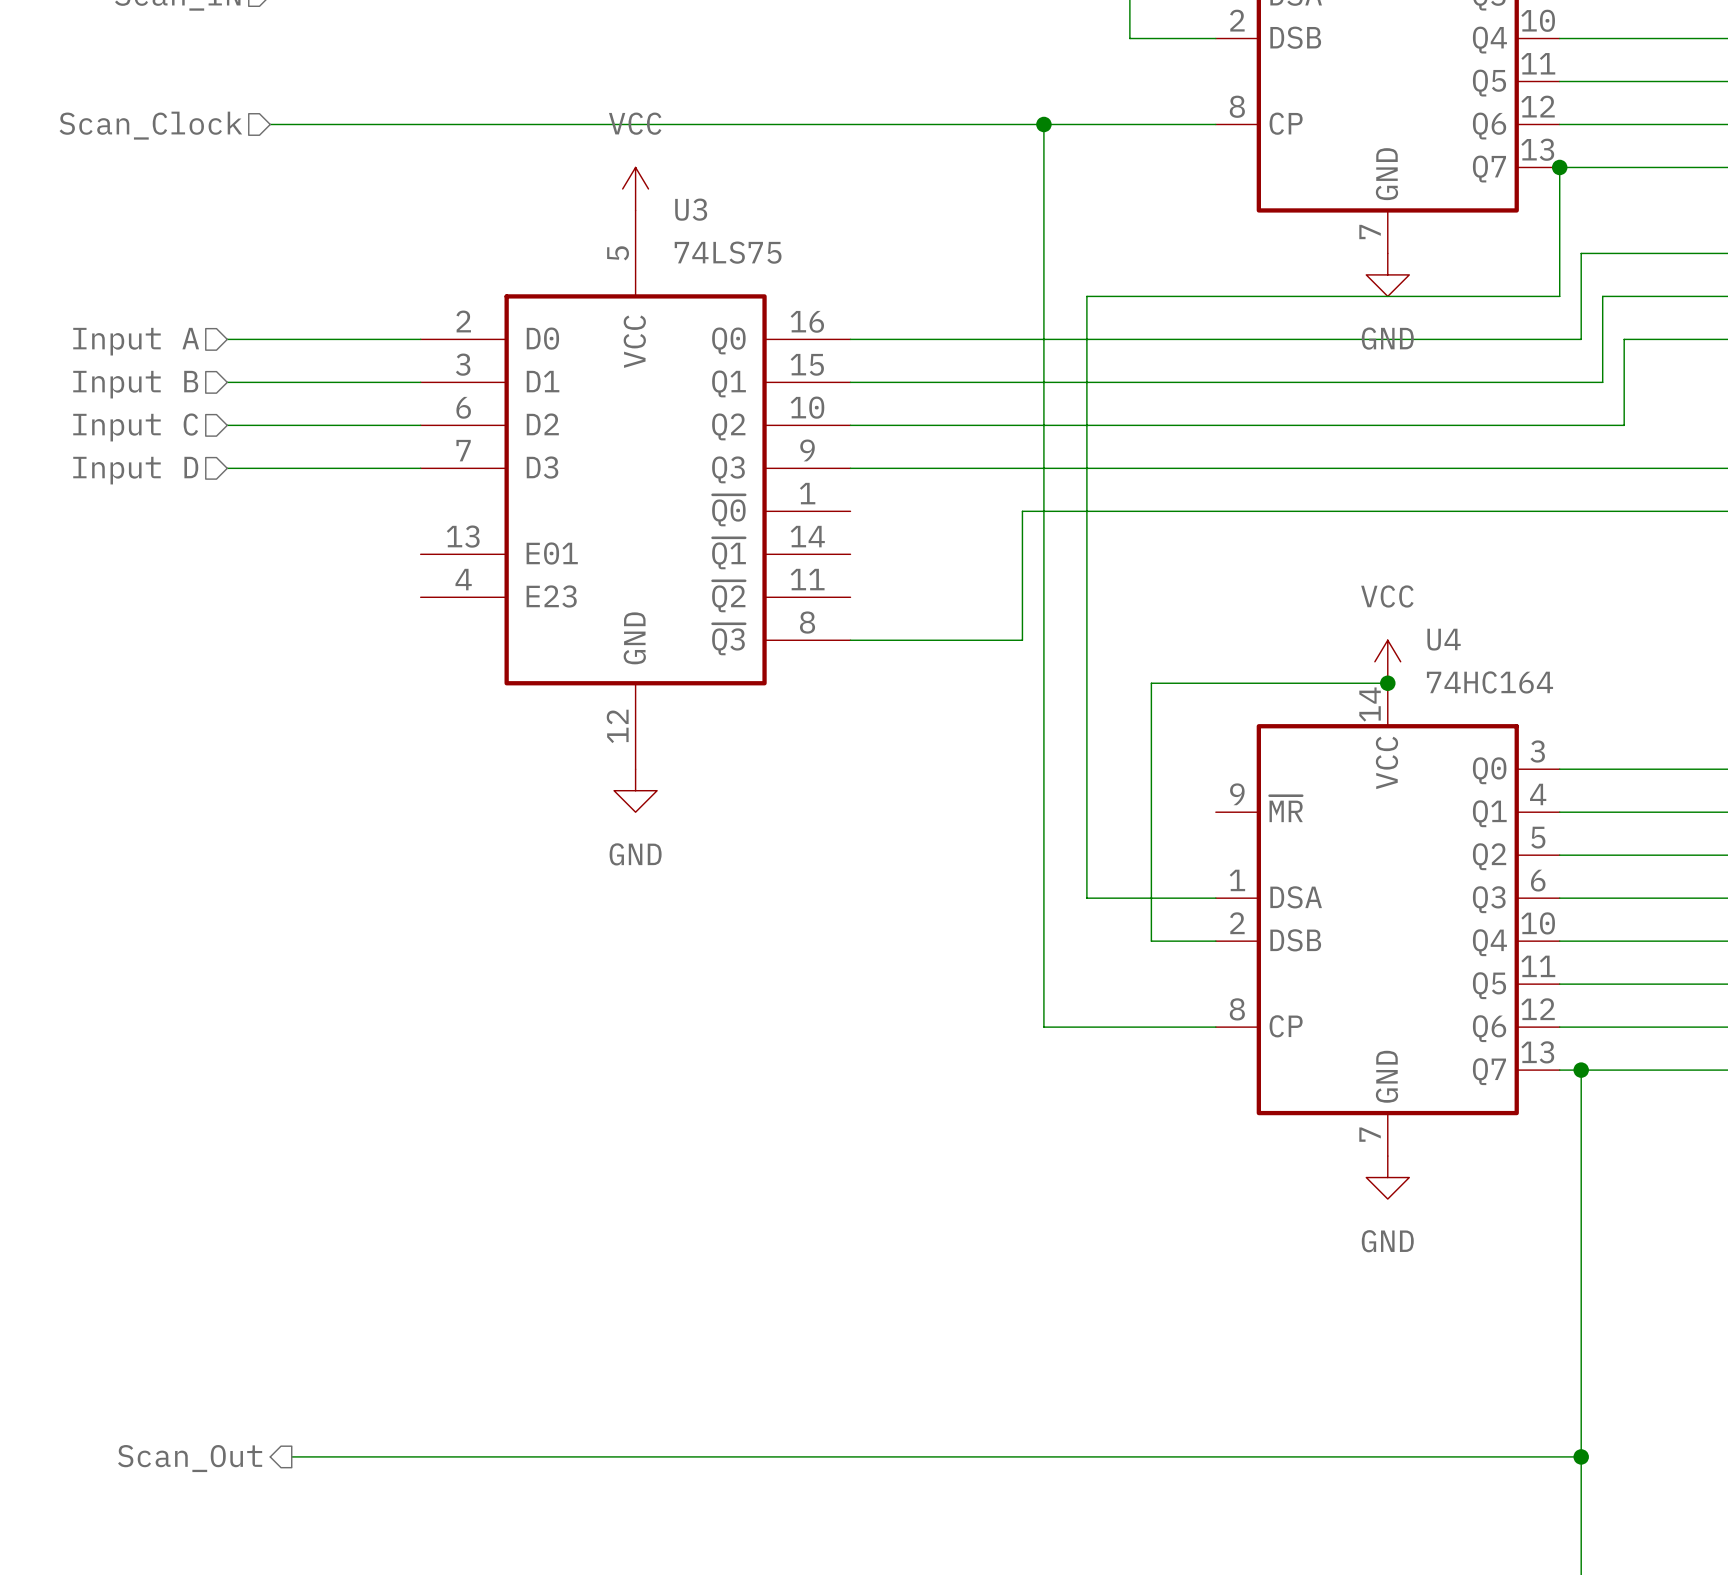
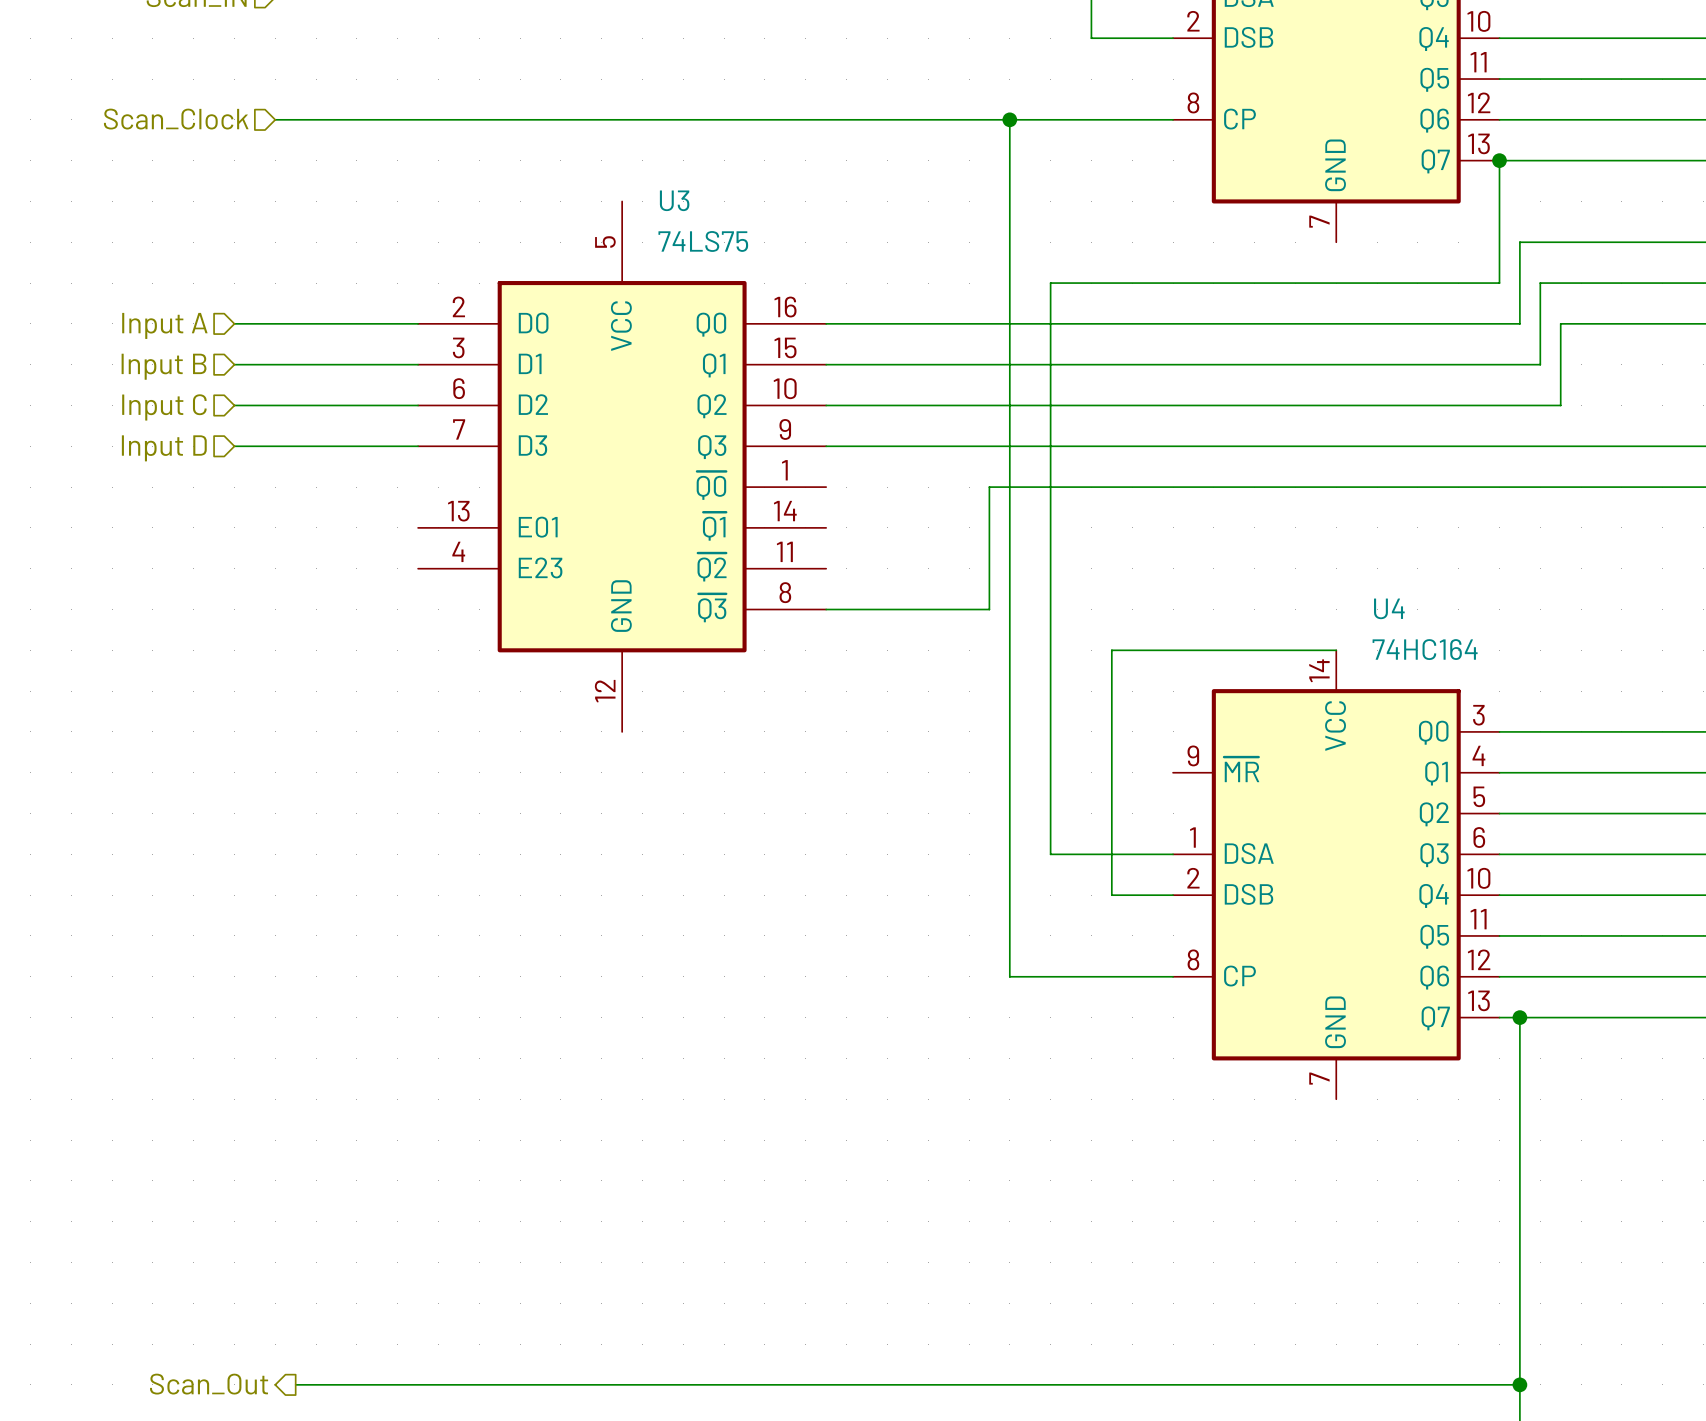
power symbol: VCC (635, 188) -> none
power symbol: GND (1387, 274) -> none
power symbol: VCC (1387, 661) -> none
junction: (1387, 683) -> none
power symbol: GND (635, 790) -> none
power symbol: GND (1387, 1177) -> none

